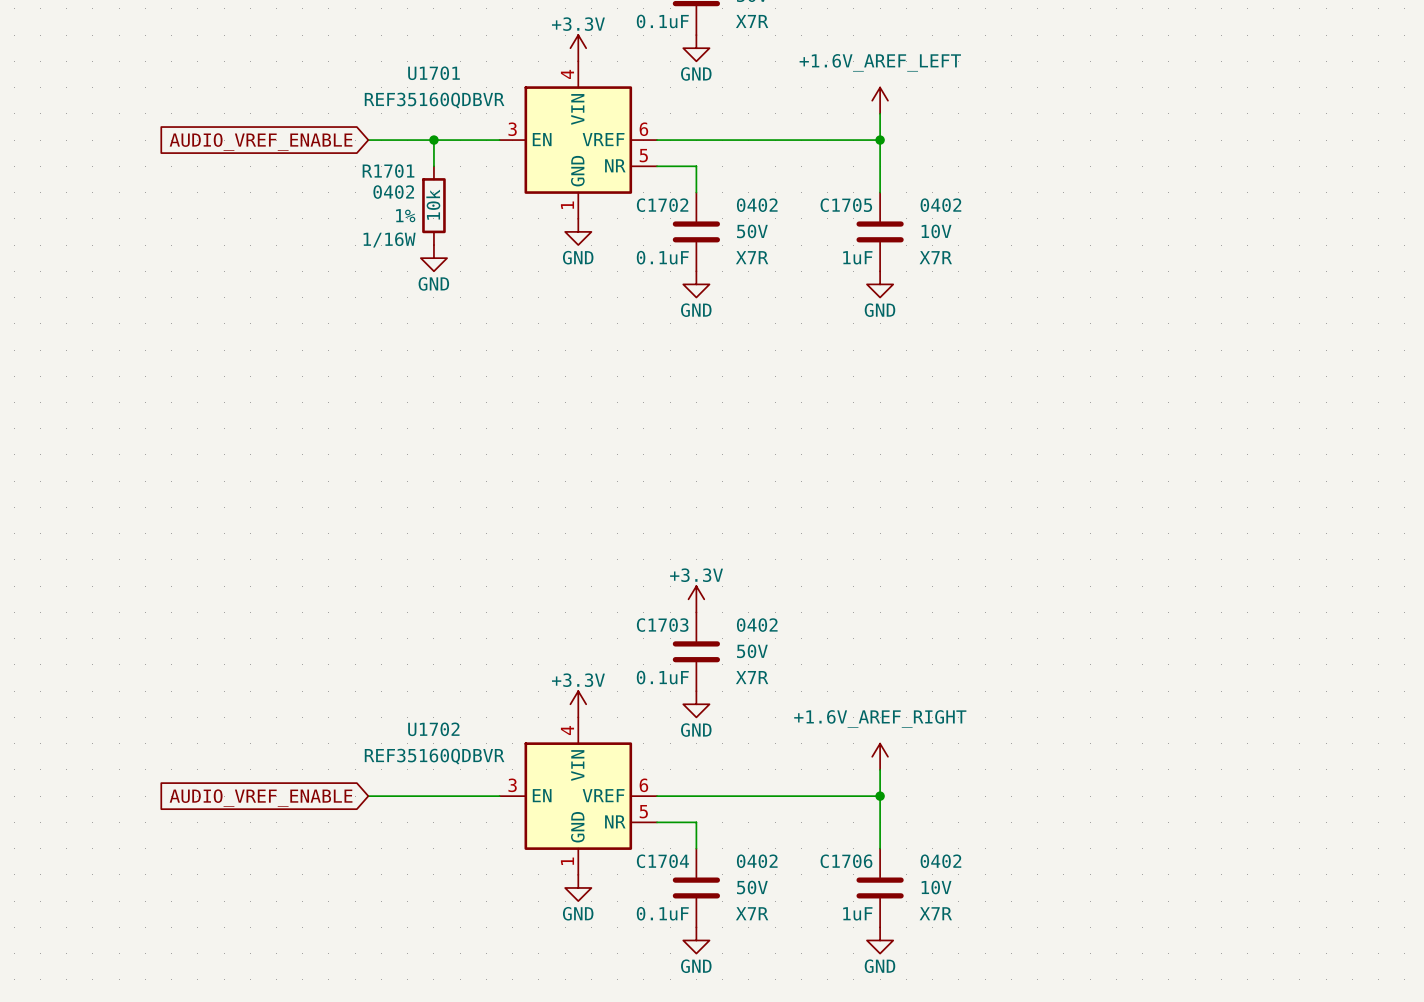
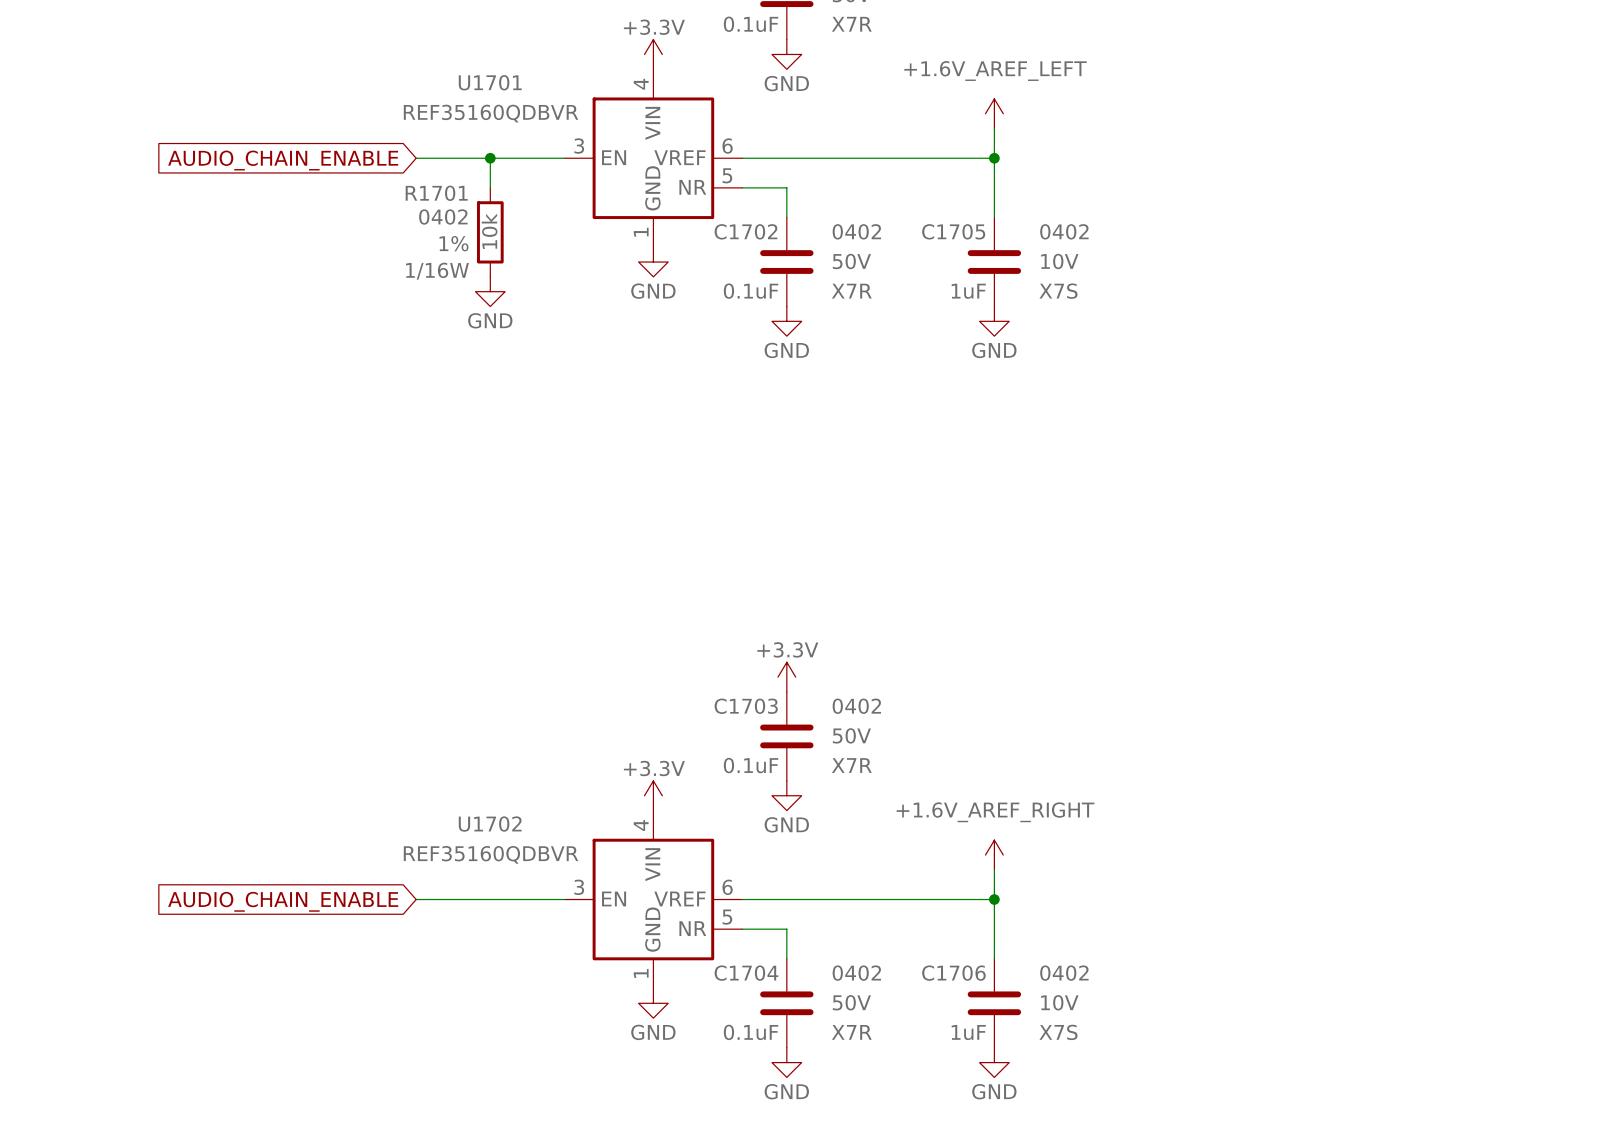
global label: AUDIO_VREF_ENABLE (261, 142) -> AUDIO_CHAIN_ENABLE (283, 160)
C1705 text: X7R (935, 257) -> X7S (1058, 291)
global label: AUDIO_VREF_ENABLE (261, 798) -> AUDIO_CHAIN_ENABLE (283, 901)
C1706 text: X7R (935, 913) -> X7S (1058, 1032)

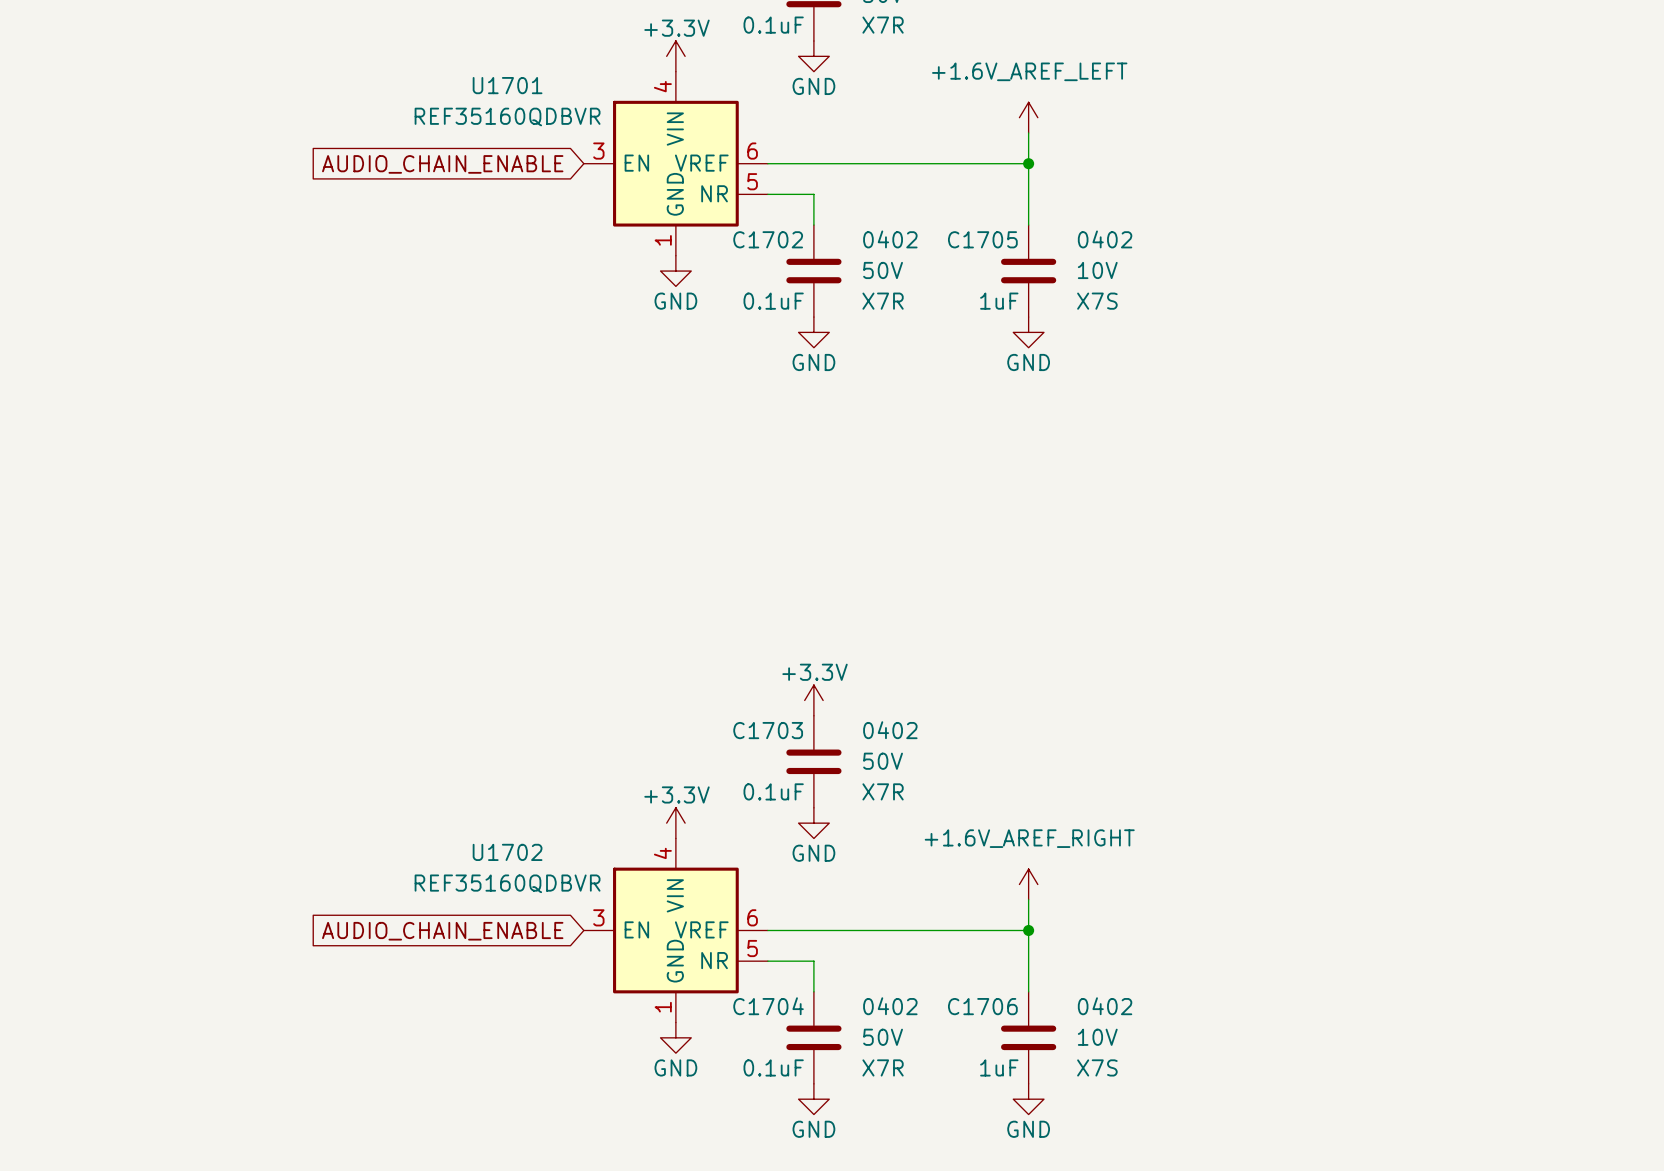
wire: (416, 158) (564, 158) -> none
wire: (490, 158) (490, 187) -> none
junction: (490, 158) -> none
global label position: AUDIO_CHAIN_ENABLE (283, 160) -> AUDIO_CHAIN_ENABLE (442, 164)
R1701: 10k (490, 232) -> none
power symbol: GND (490, 291) -> none
wire: (416, 899) (564, 899) -> none
global label position: AUDIO_CHAIN_ENABLE (283, 901) -> AUDIO_CHAIN_ENABLE (442, 931)

